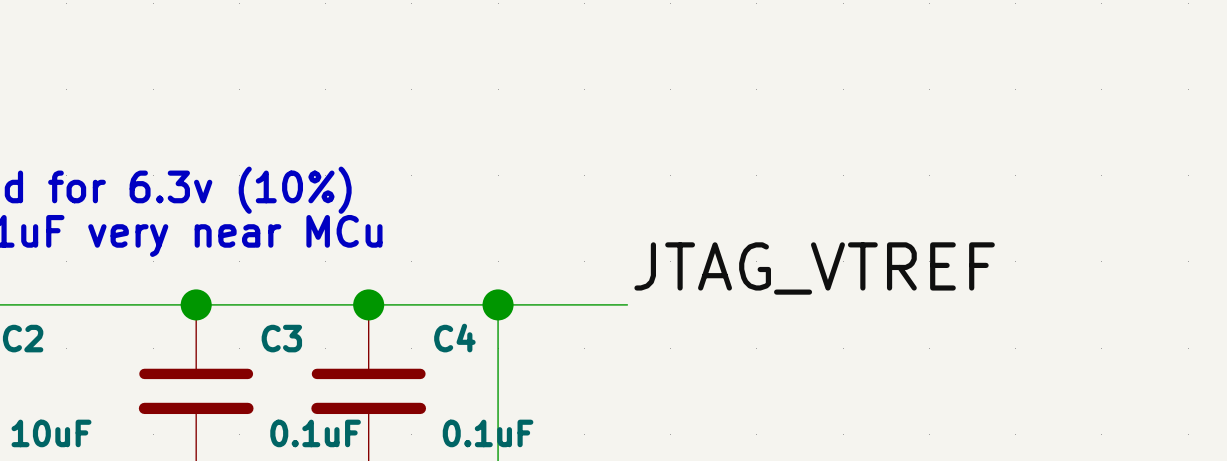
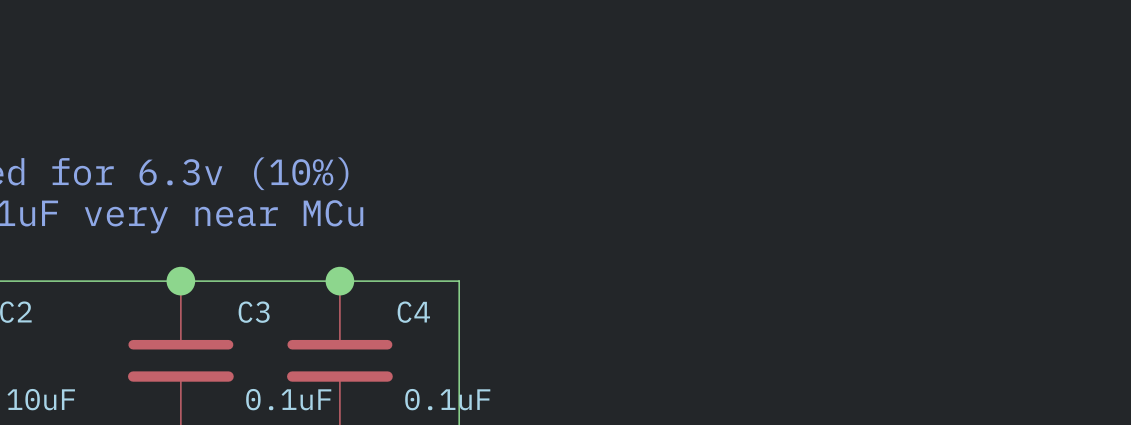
label: JTAG_VTREF (814, 268) -> none
wire: (498, 304) (627, 304) -> none
junction: (498, 304) -> none

